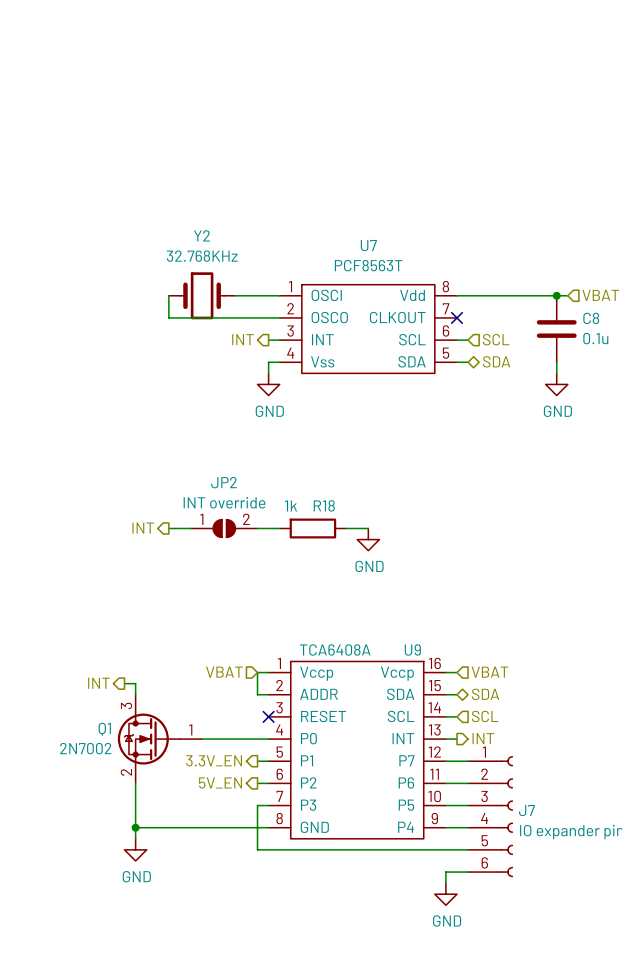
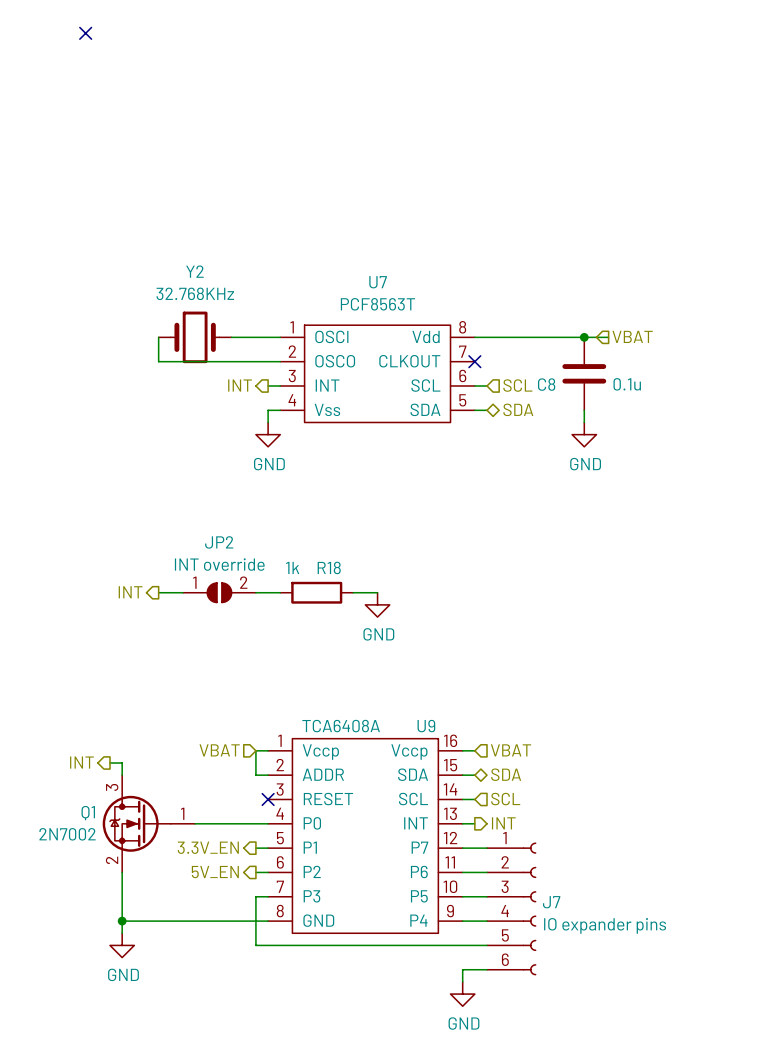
no-connect mark: none -> (85, 33)
wire: none -> (596, 337) (608, 337)
C8 name position: C8 (591, 318) -> C8 (546, 384)

